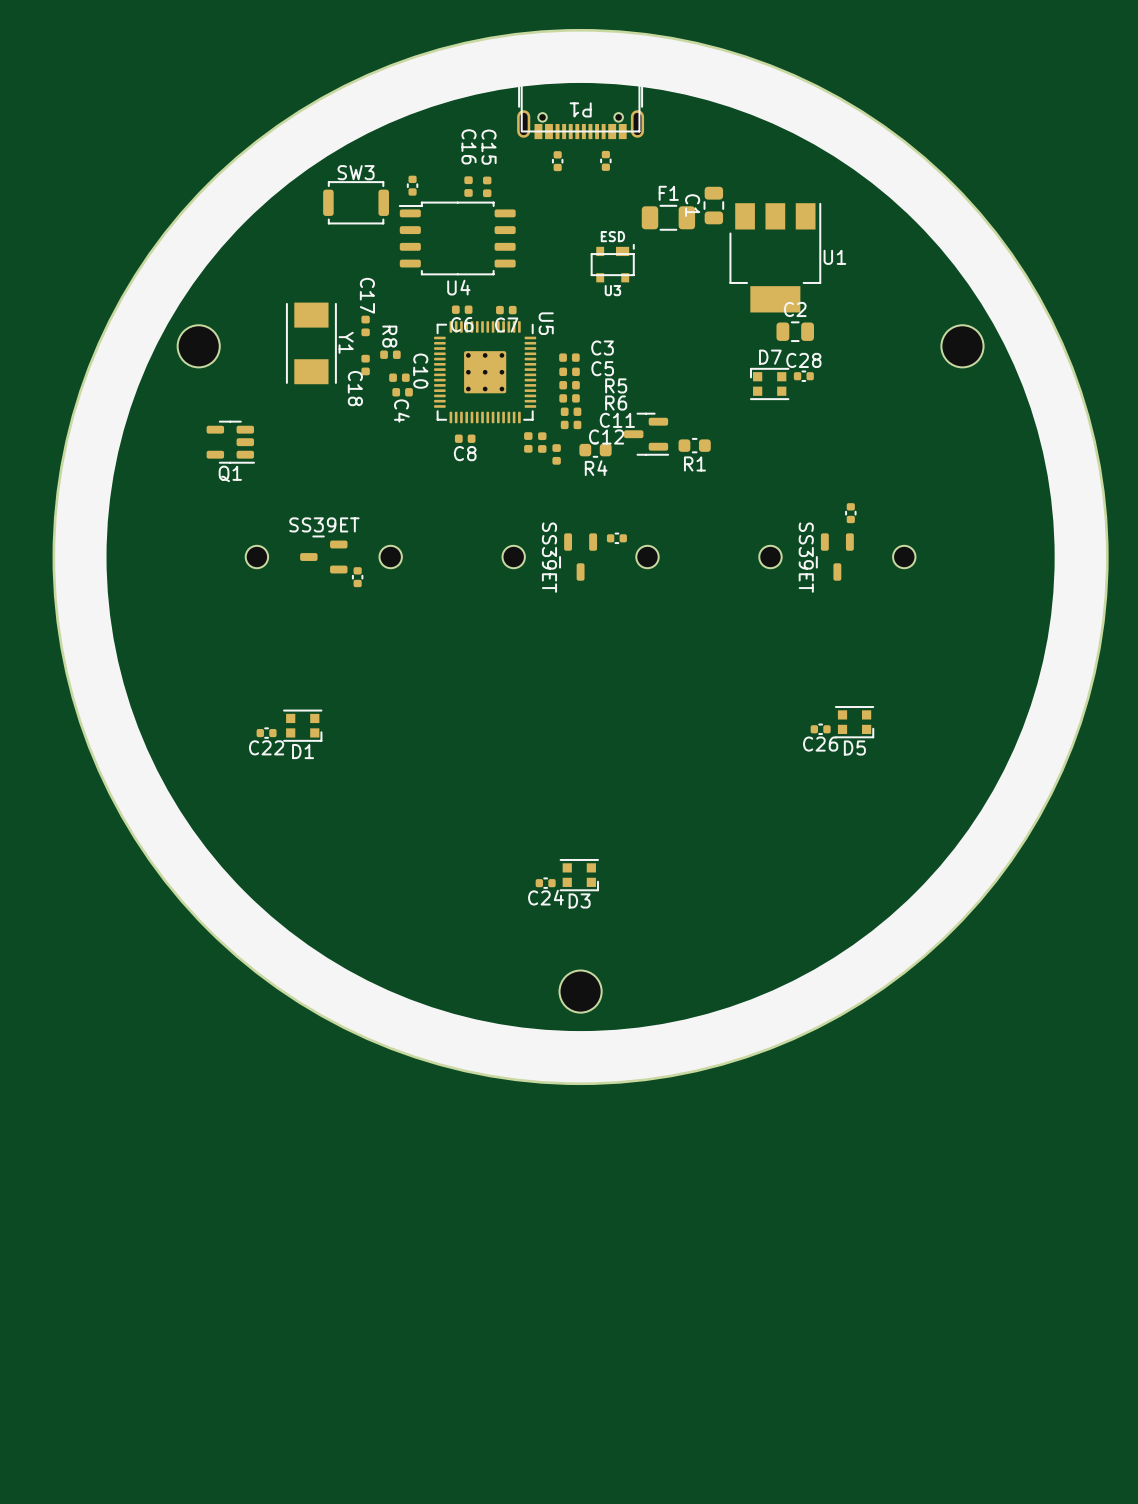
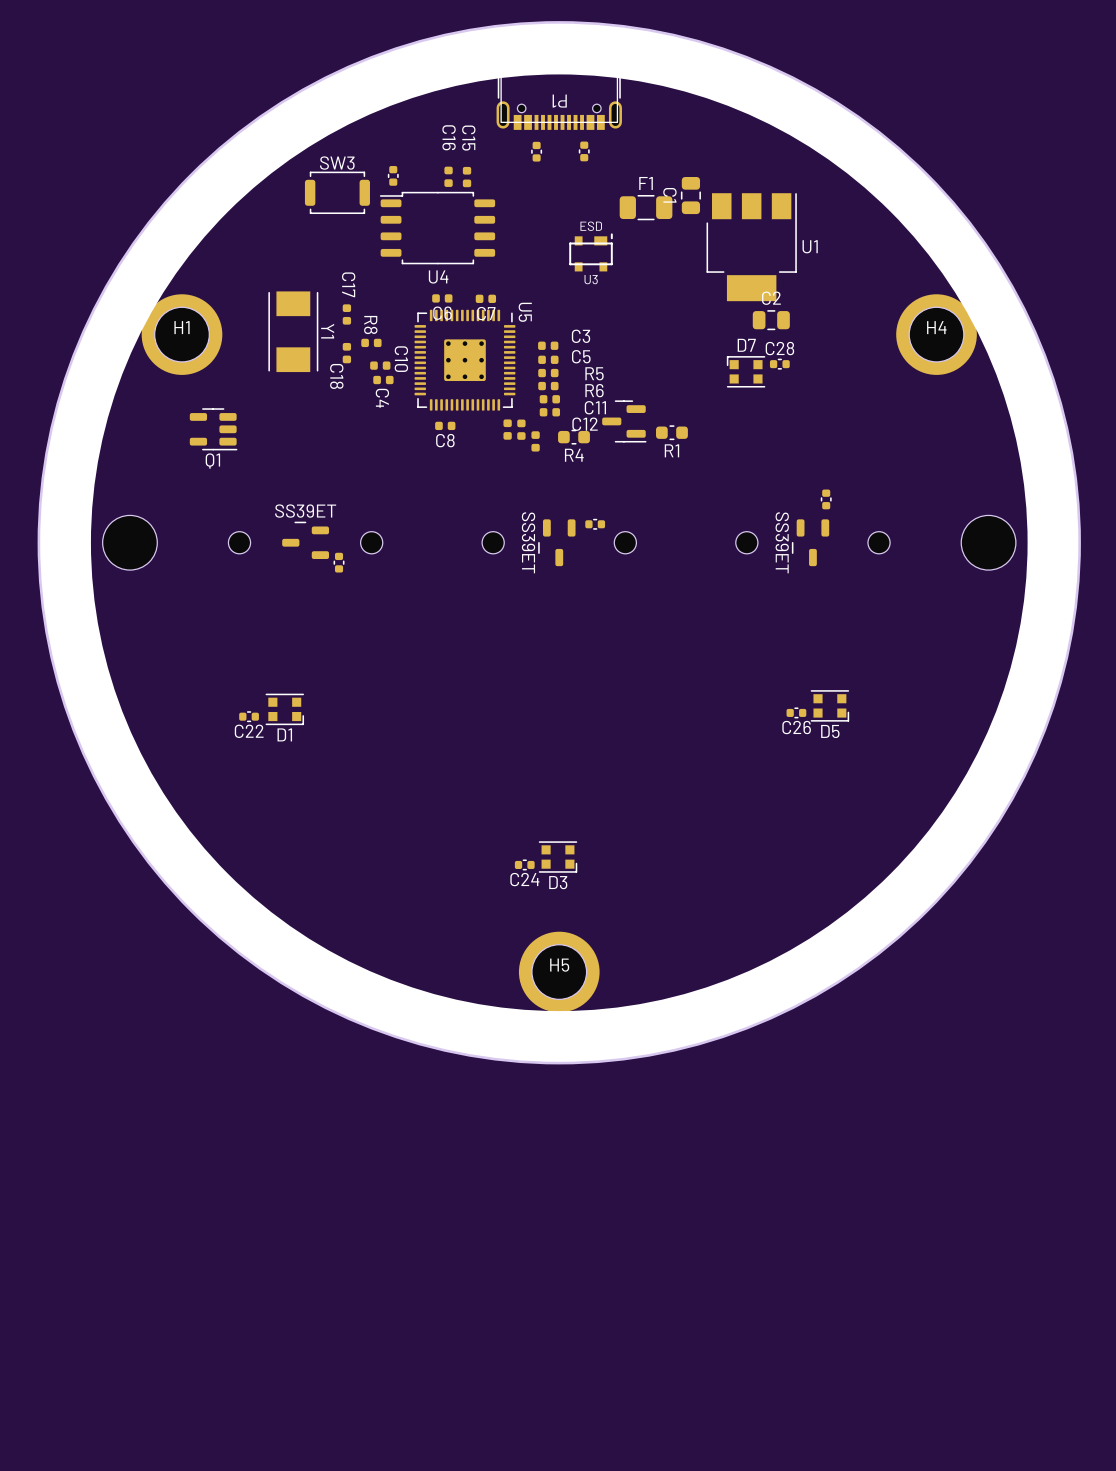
part: (198, 346) -> none
H1: none -> (182, 334)
part: (962, 346) -> none
H4: none -> (936, 334)
part: none -> (129, 542)
part: none -> (988, 542)
part: (580, 991) -> none
H5: none -> (559, 972)

